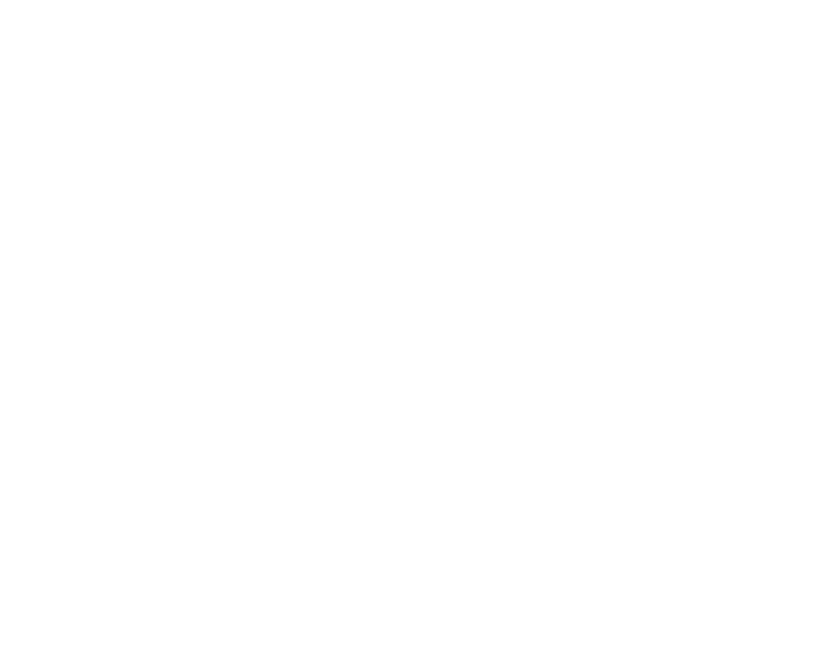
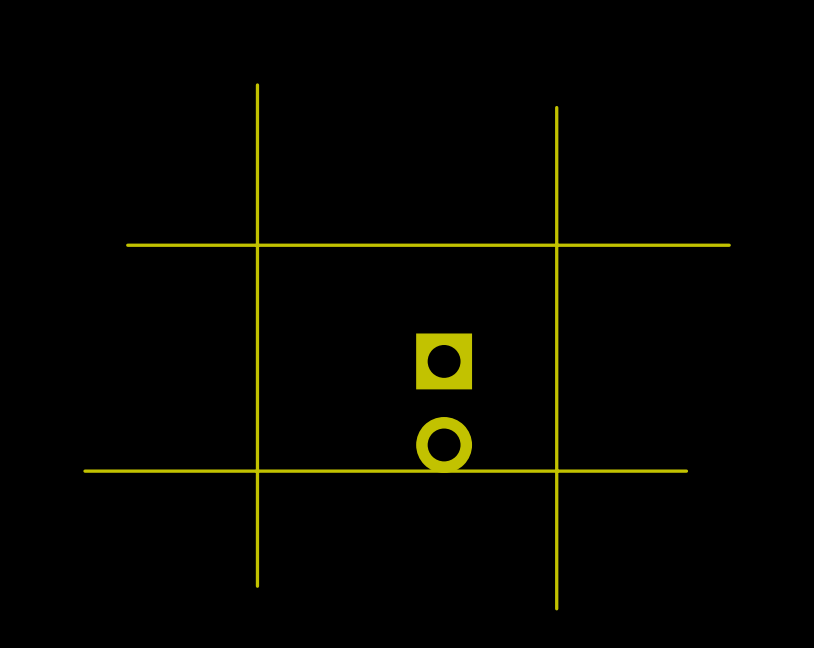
board edge: none -> (257, 84) (257, 586)
board edge: none -> (556, 107) (556, 608)
board edge: none -> (729, 245) (127, 245)
part: none -> (444, 403)
board edge: none -> (686, 471) (84, 471)

